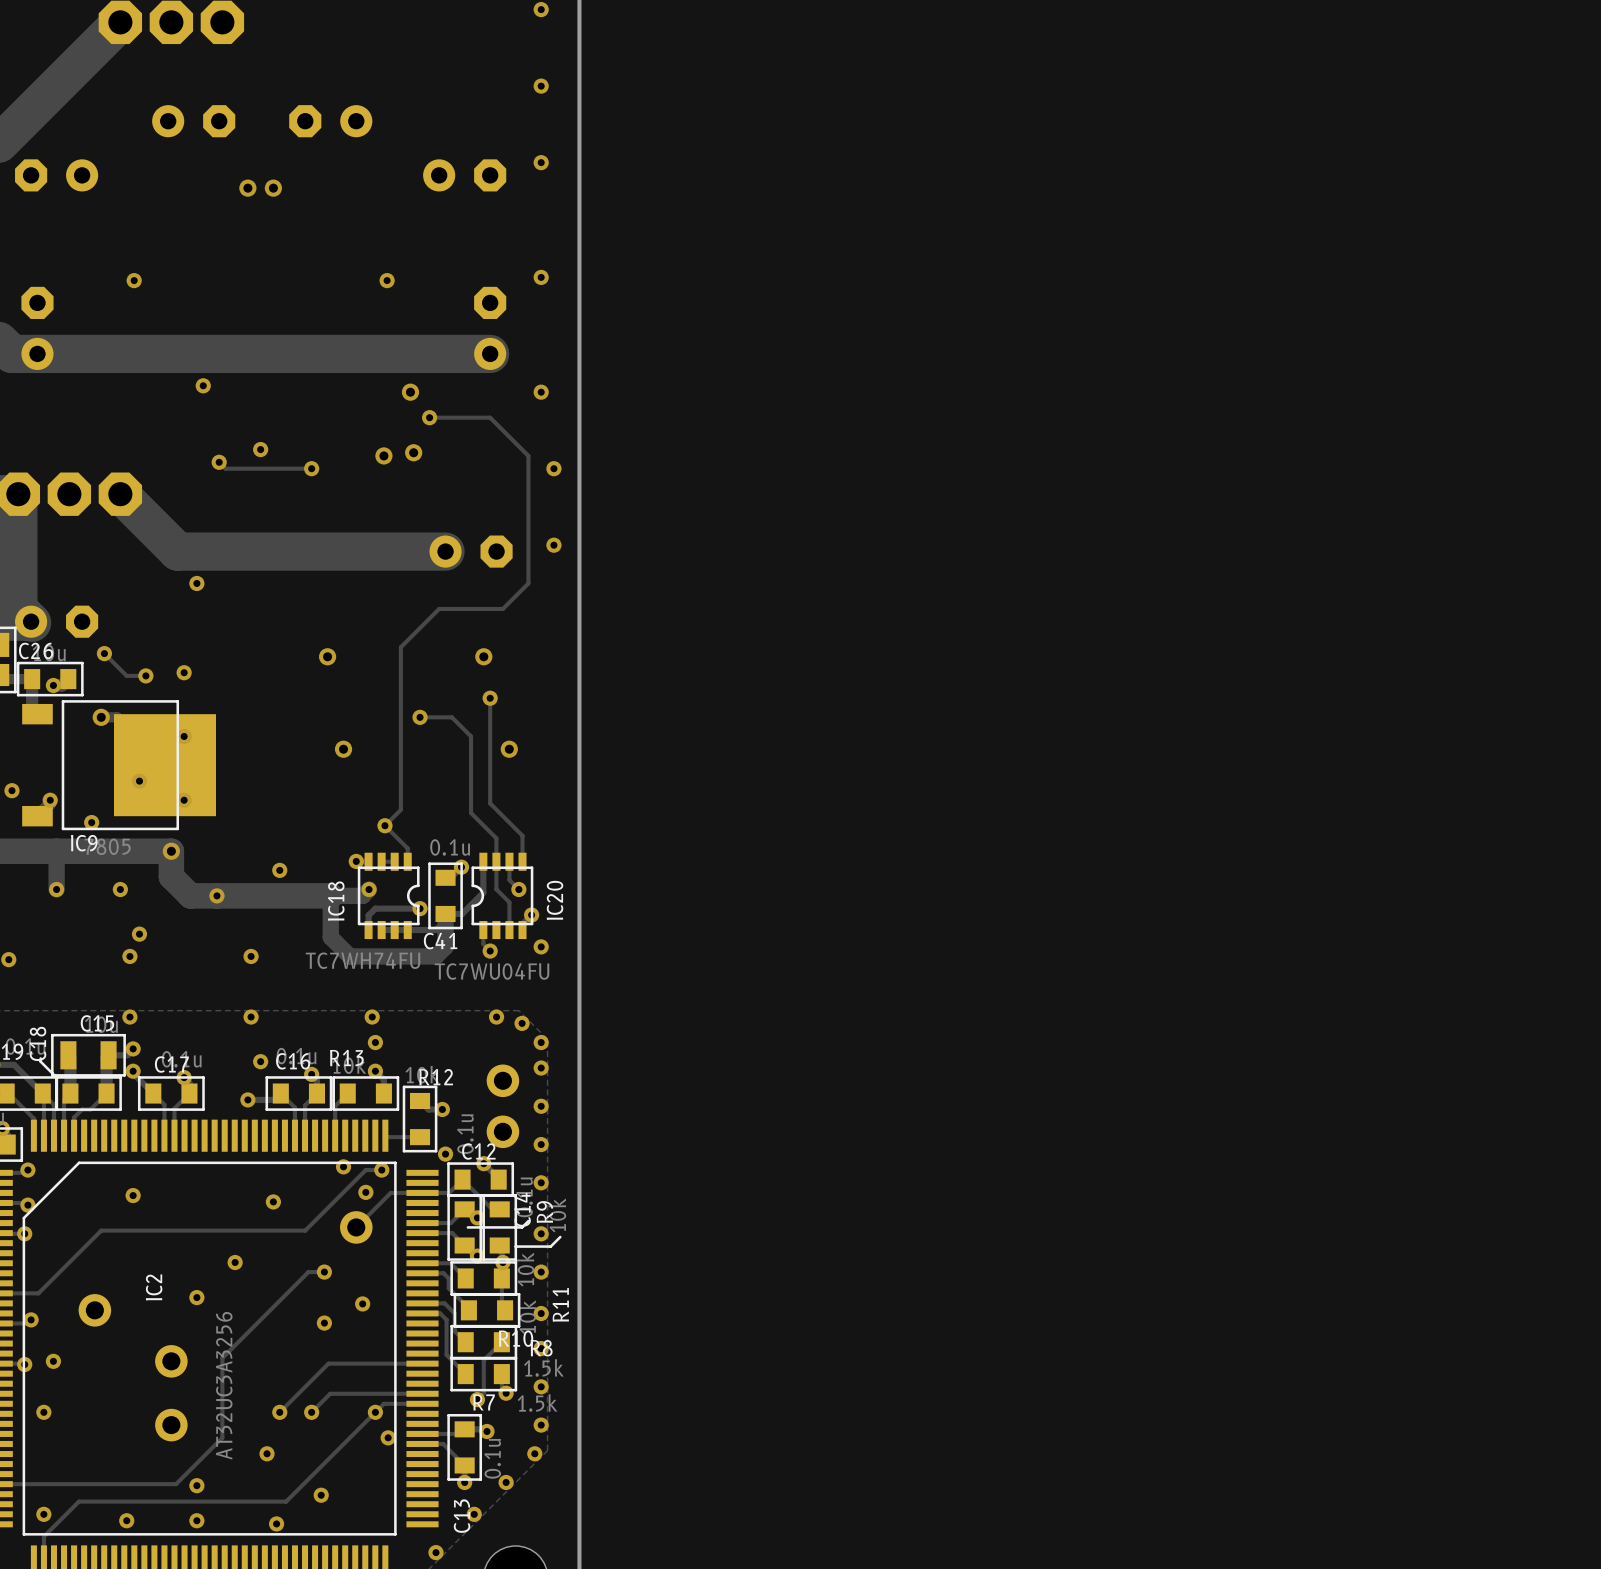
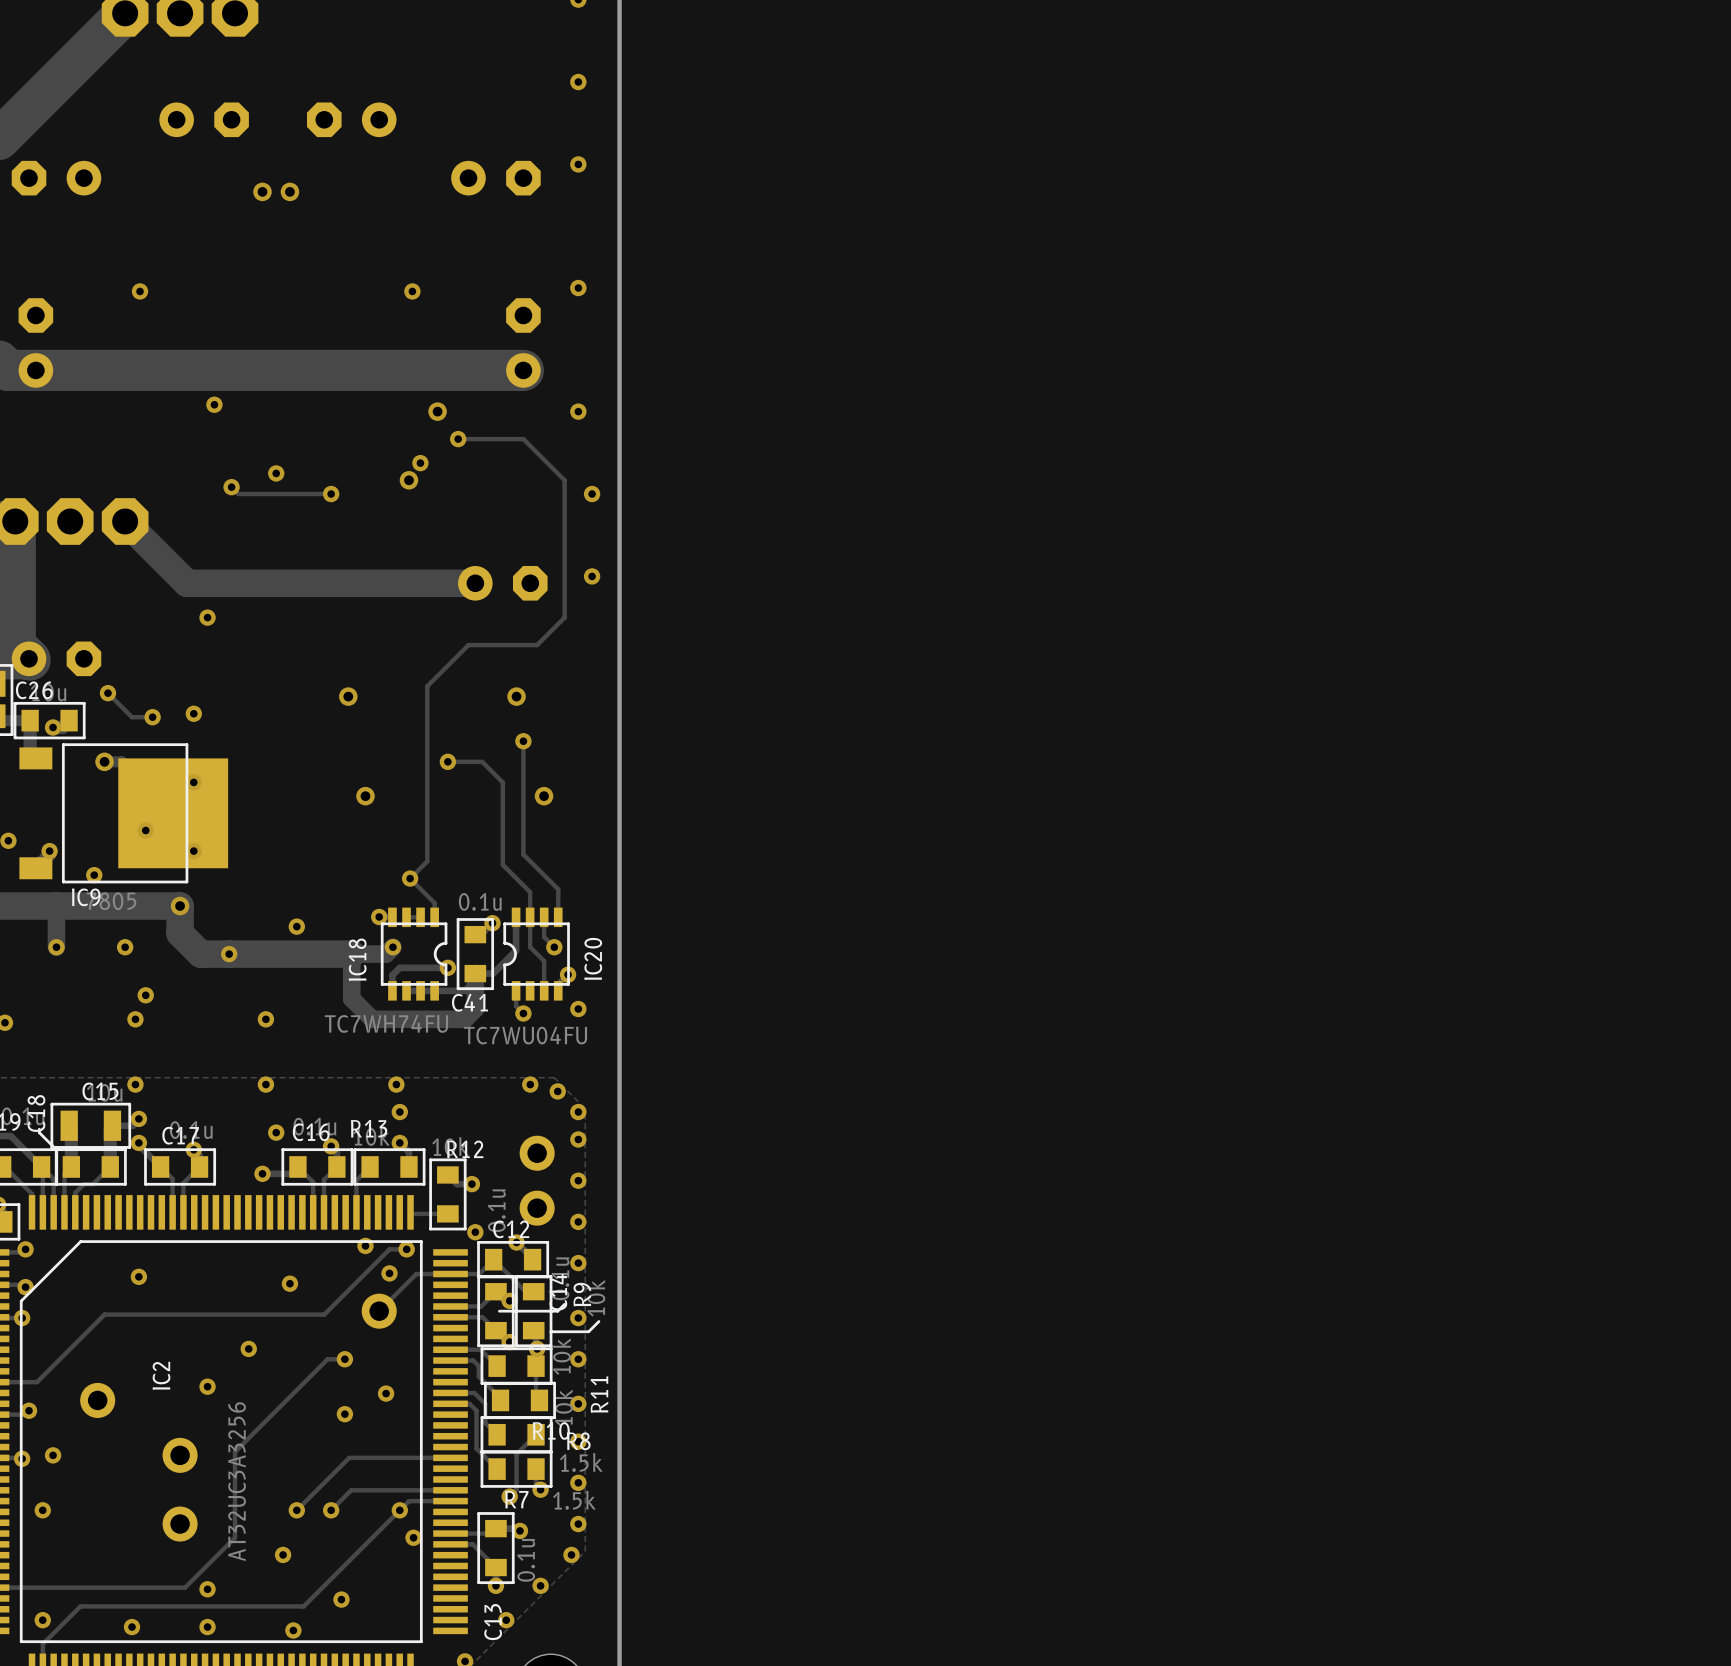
via: none -> (420, 463)
via: (413, 452) -> none
track width: thick (120, 494) (177, 551) (445, 551) -> thin (125, 521) (186, 583) (475, 583)

